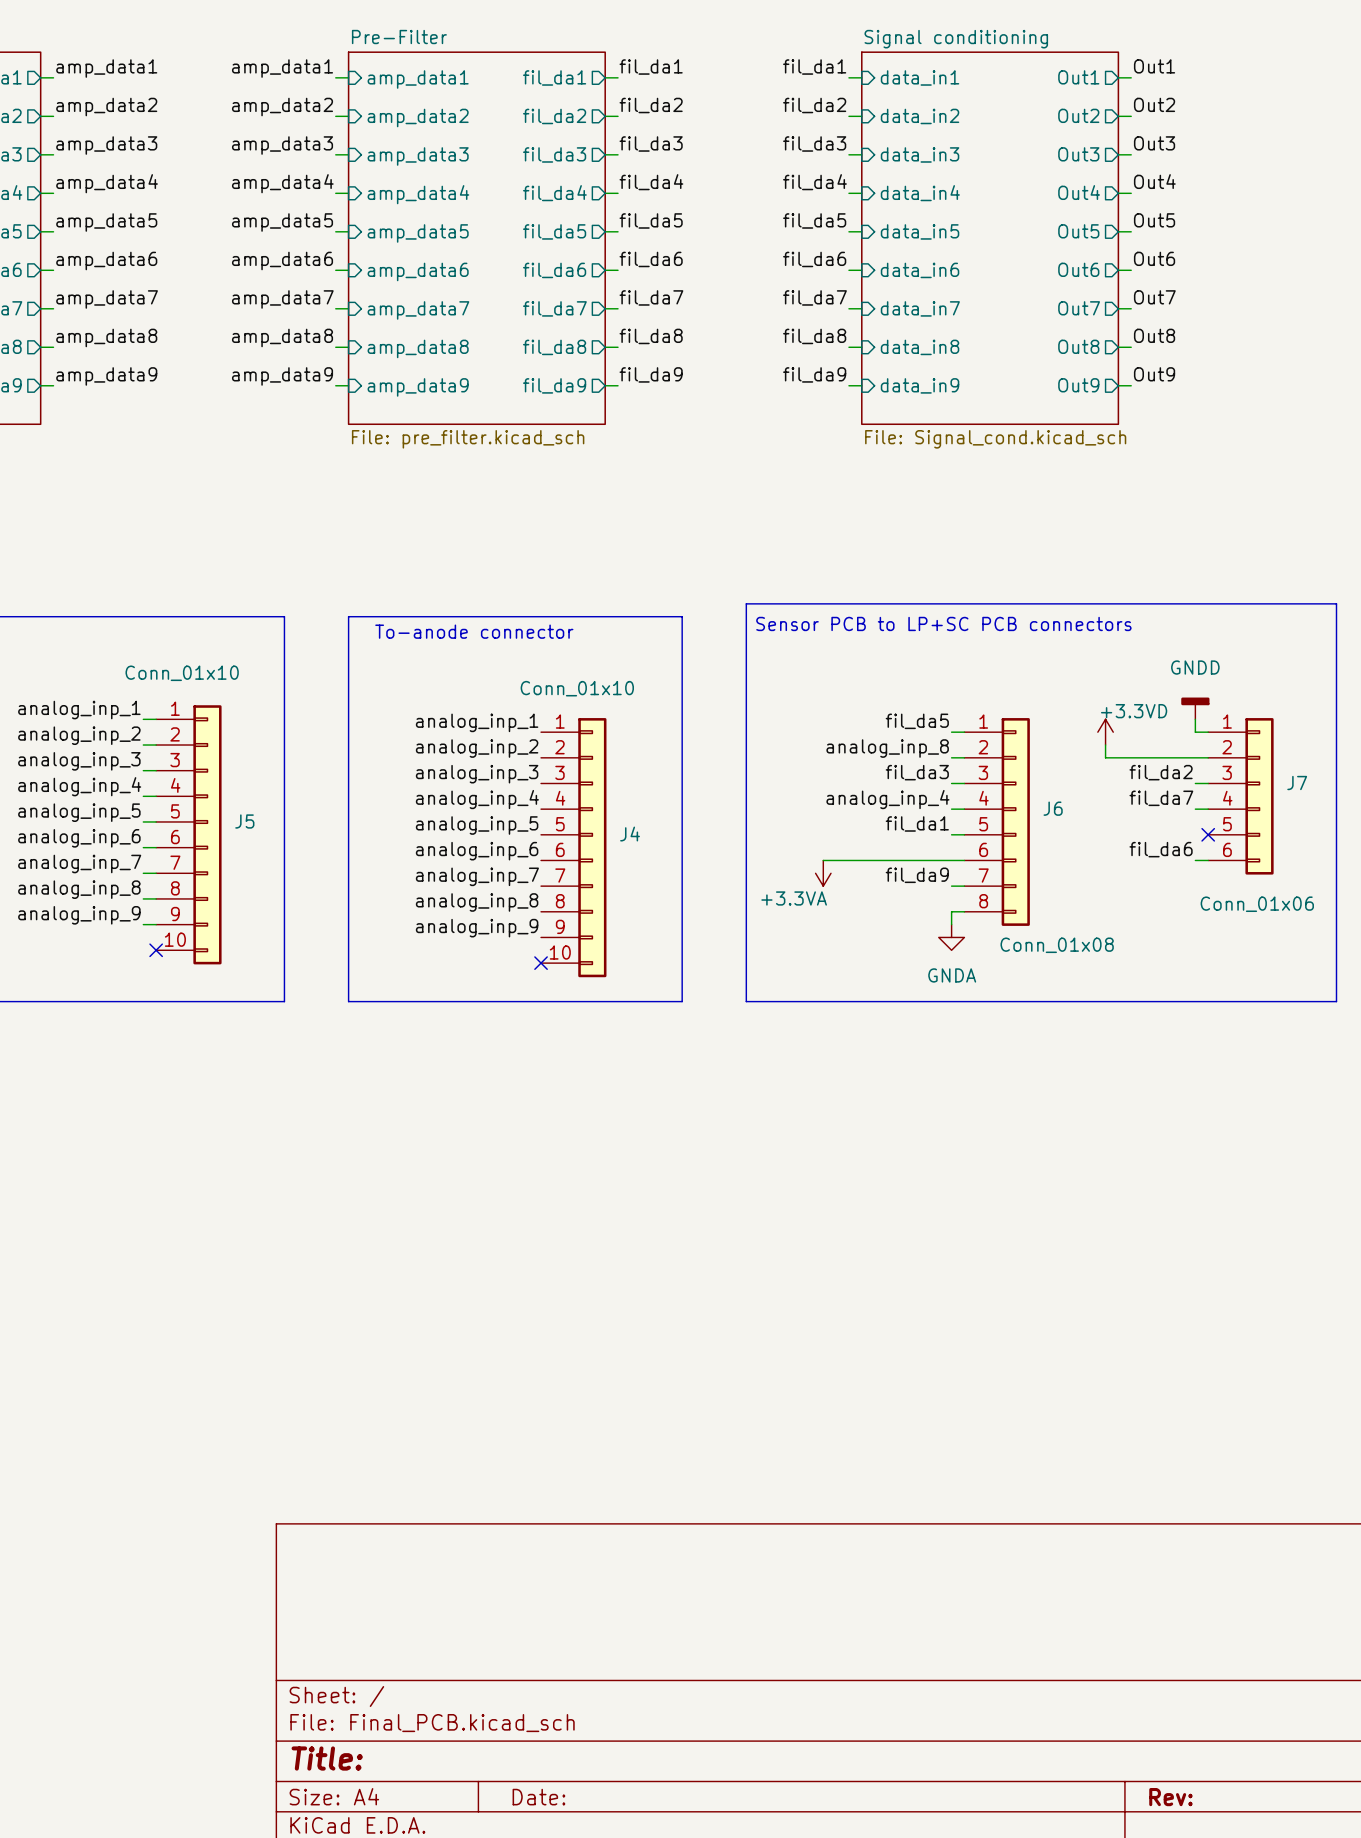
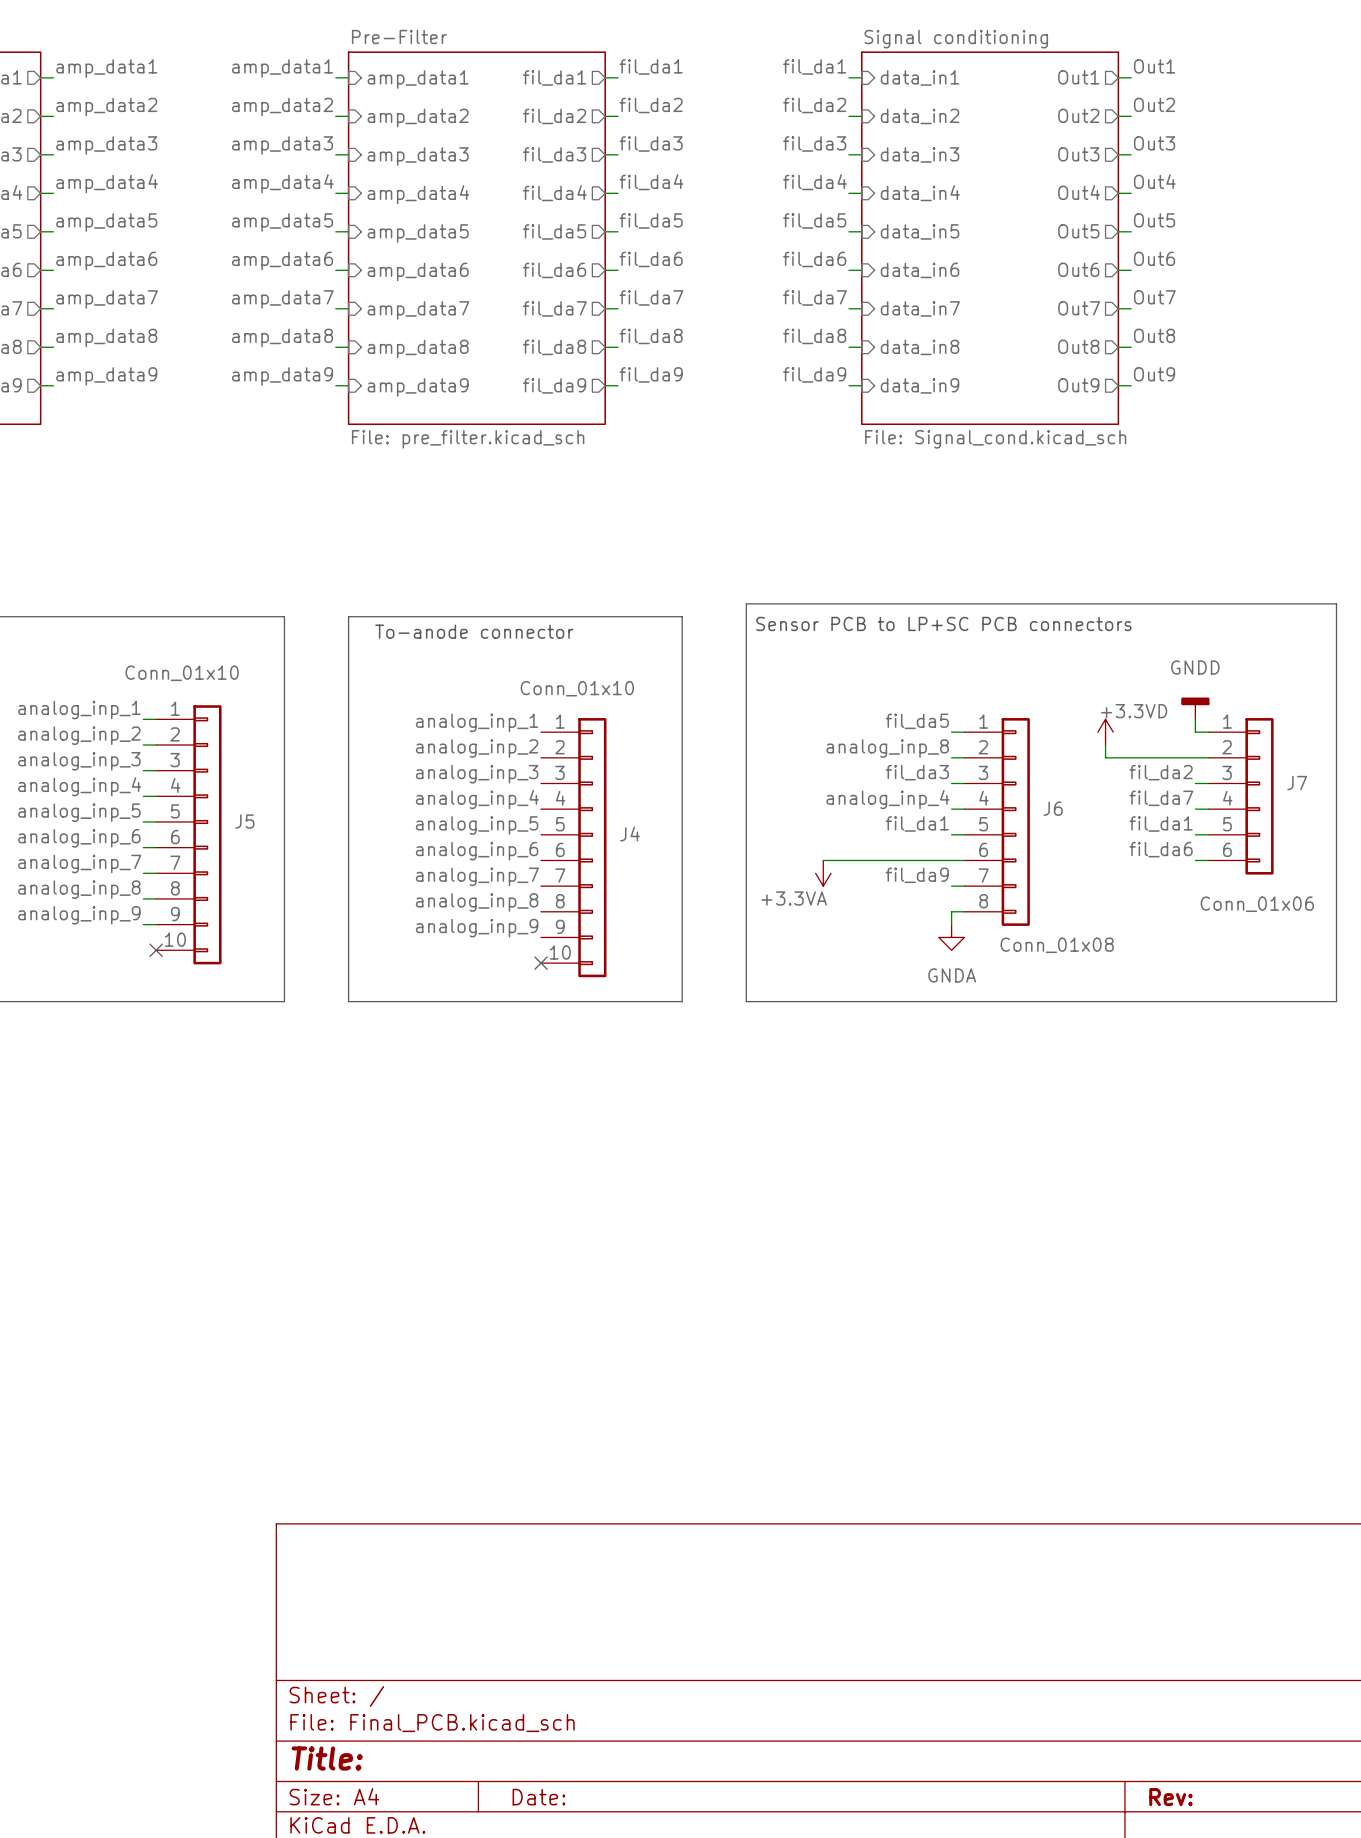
label: none -> fil_da1 (1161, 823)
wire: none -> (1195, 834) (1208, 834)
no-connect mark: (1208, 834) -> none

